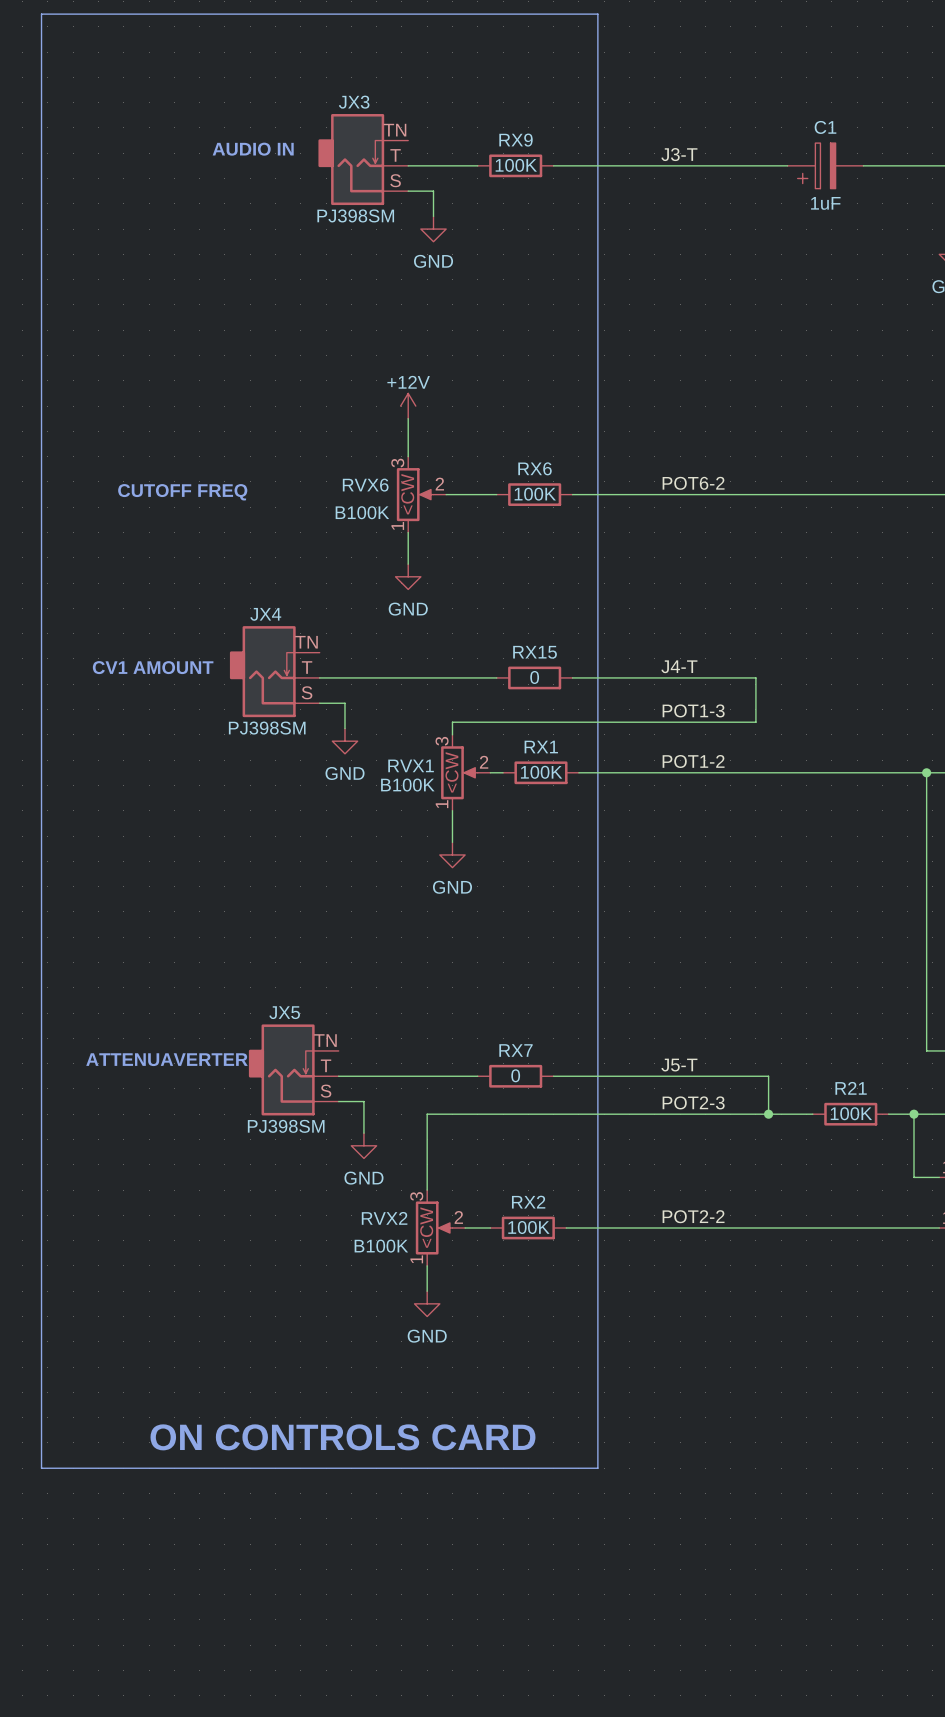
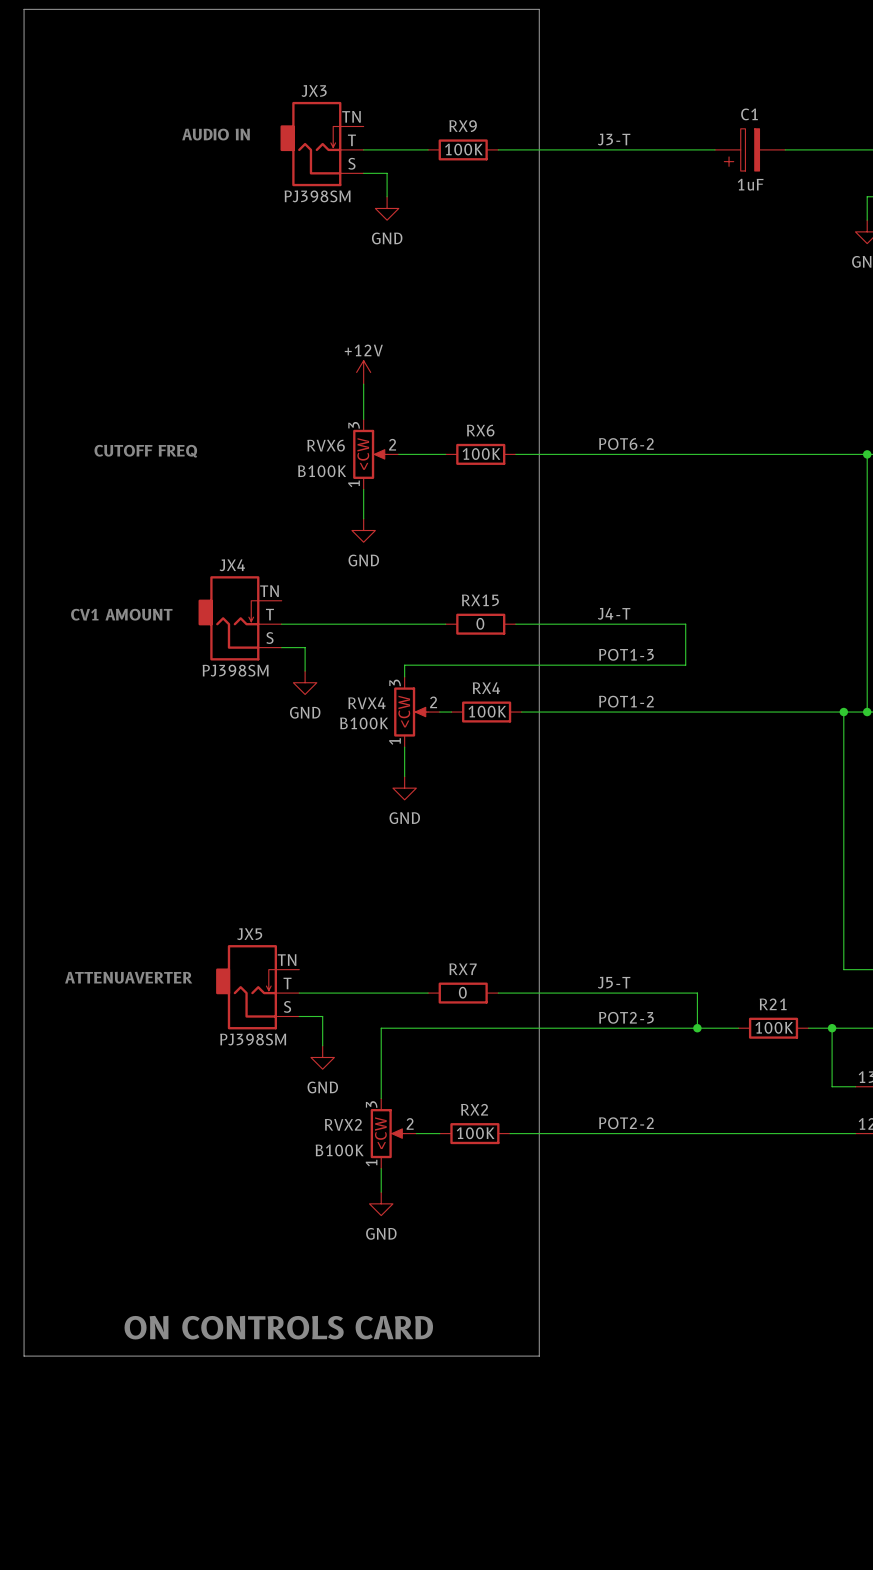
RX1 name: RX1 (541, 747) -> RX4 (486, 688)
RVX1 name: RVX1 (411, 765) -> RVX4 (366, 703)

